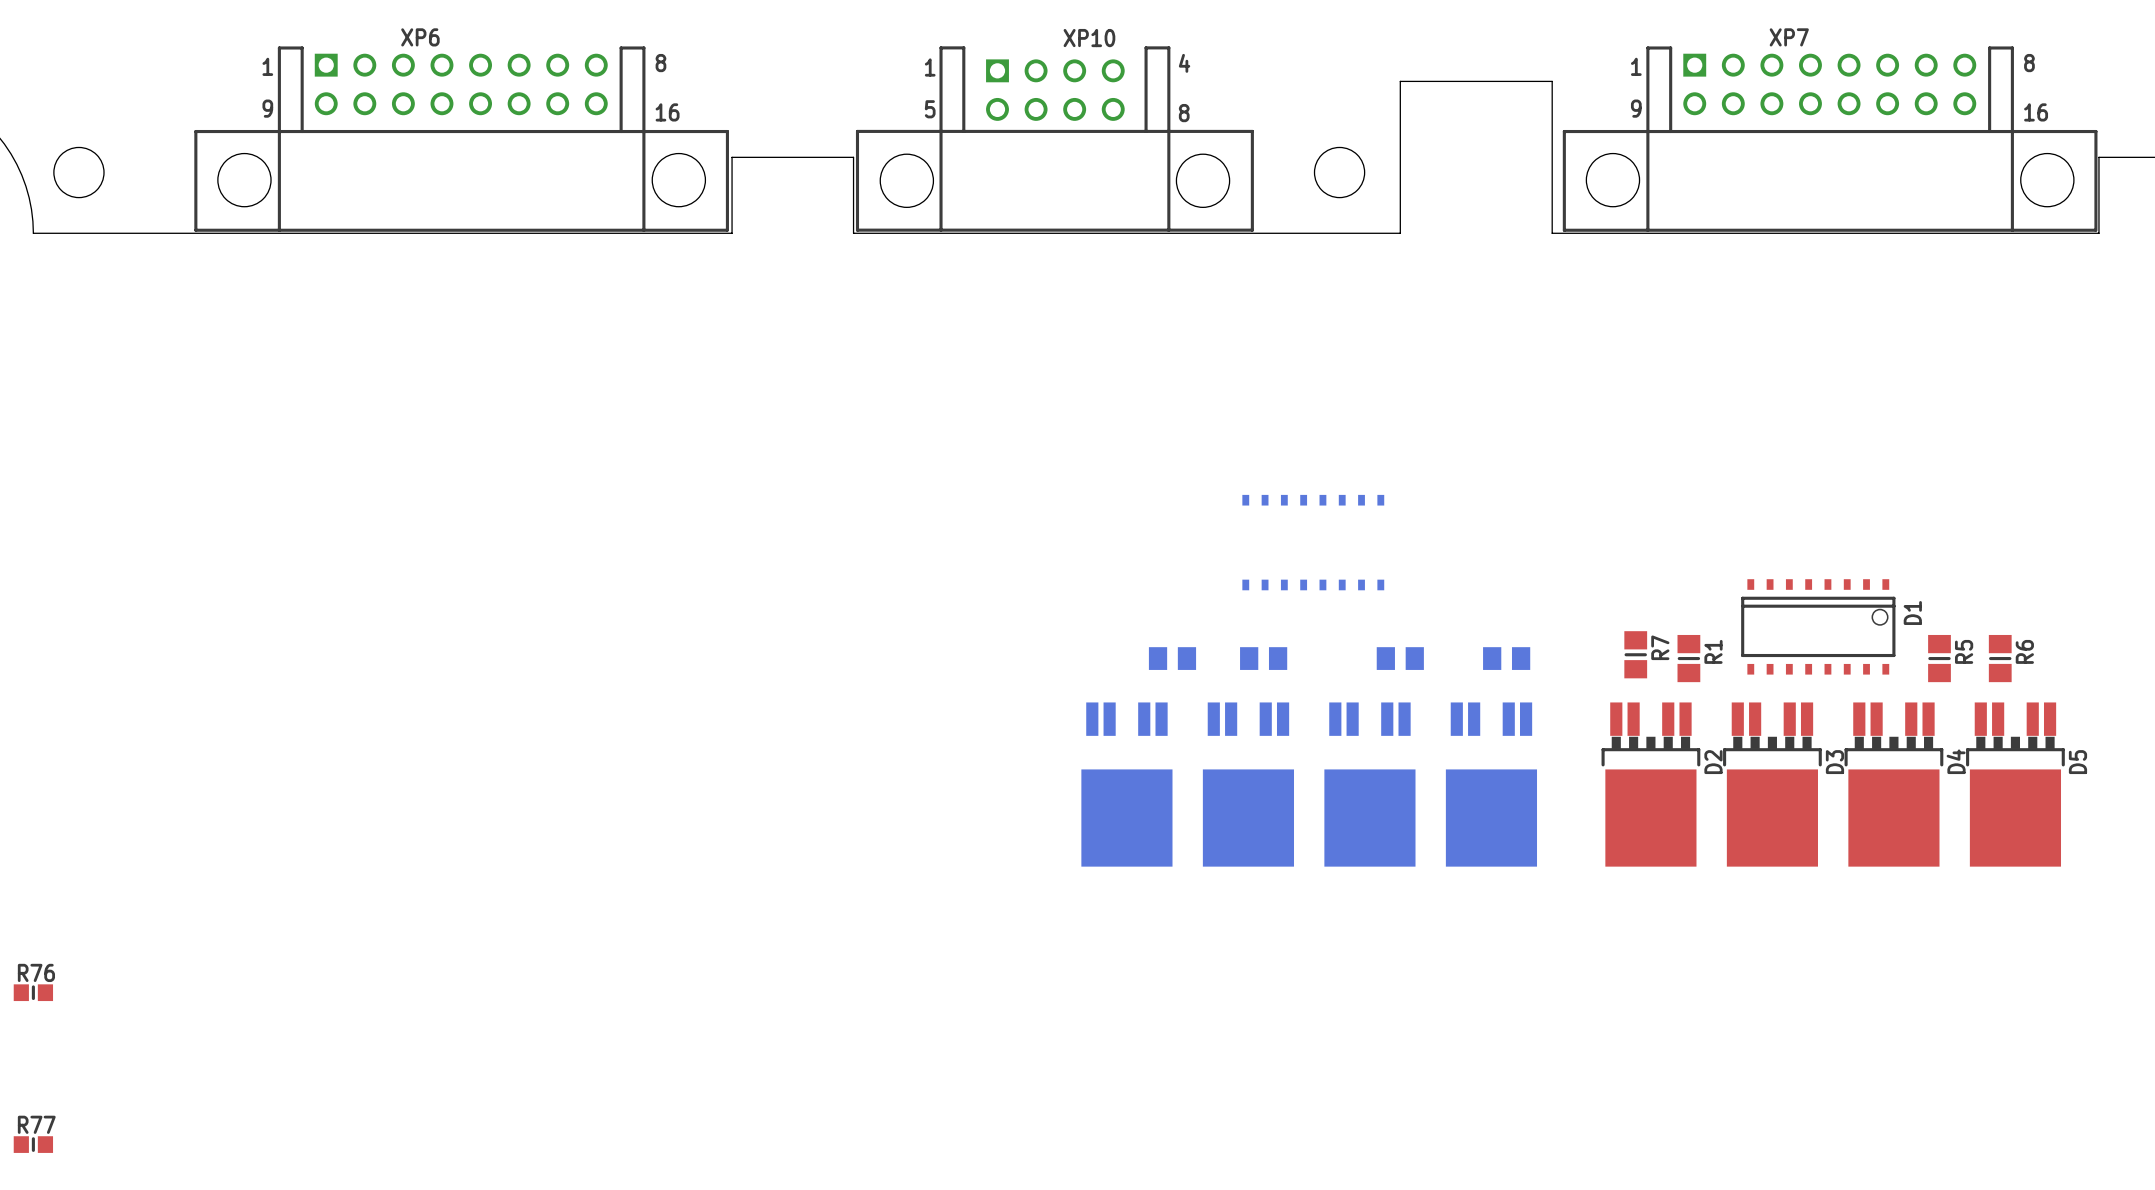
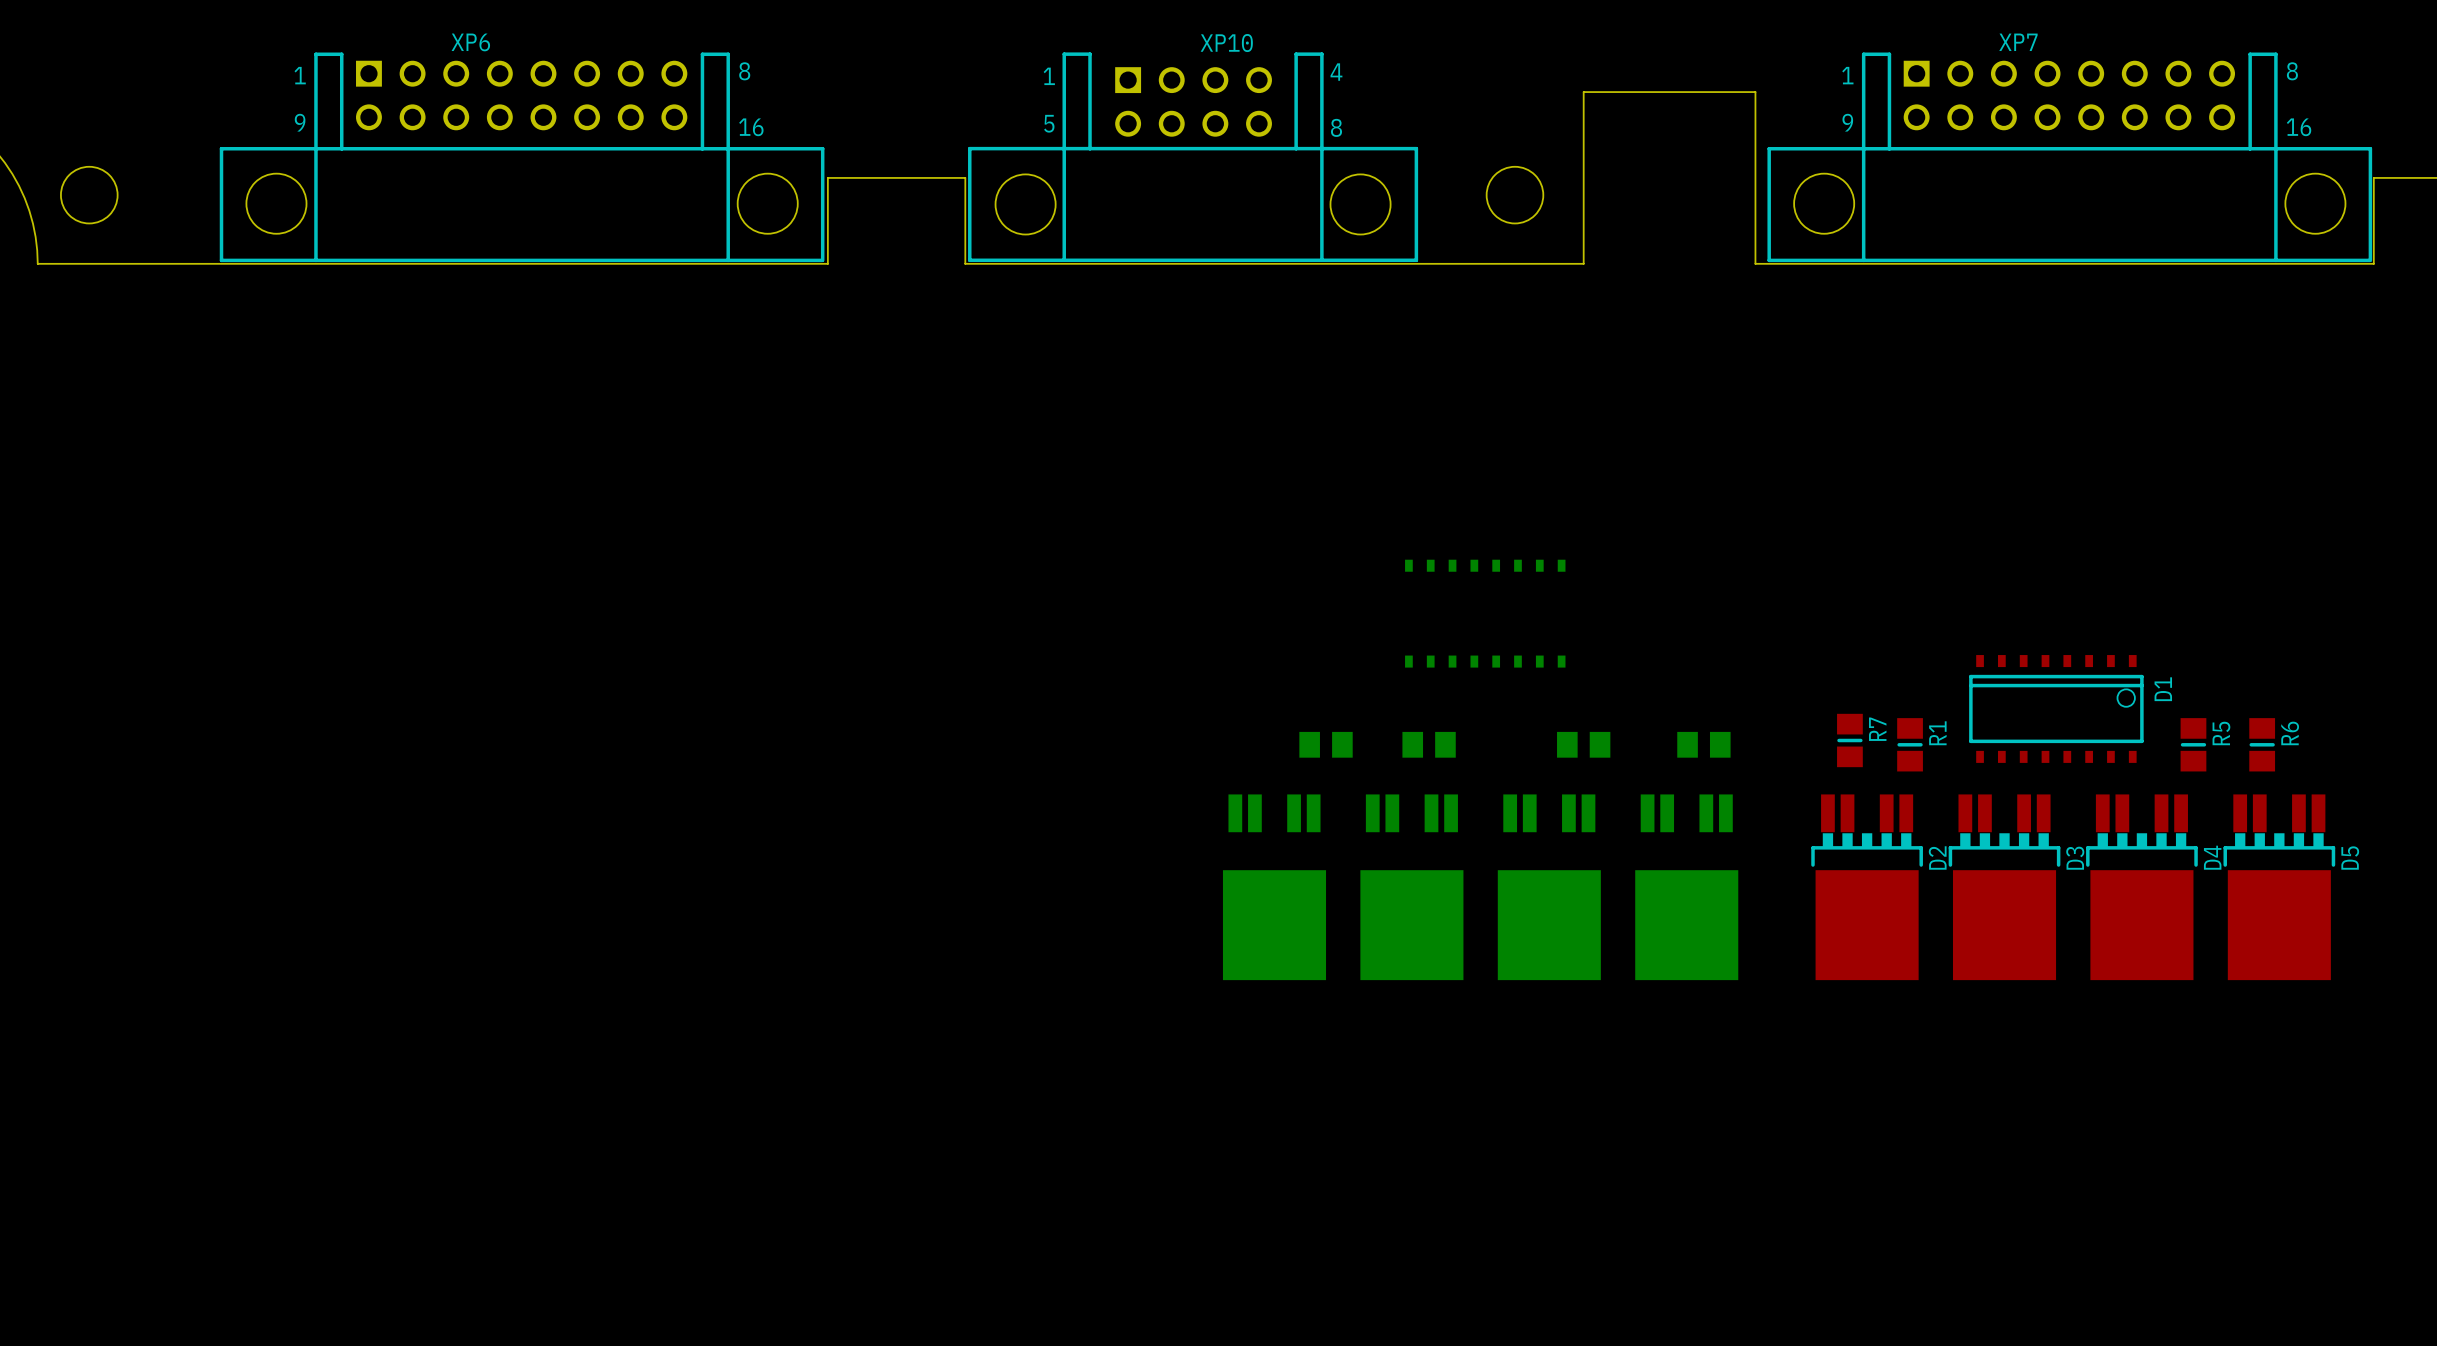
R76: (33, 992) -> none
R77: (33, 1144) -> none

